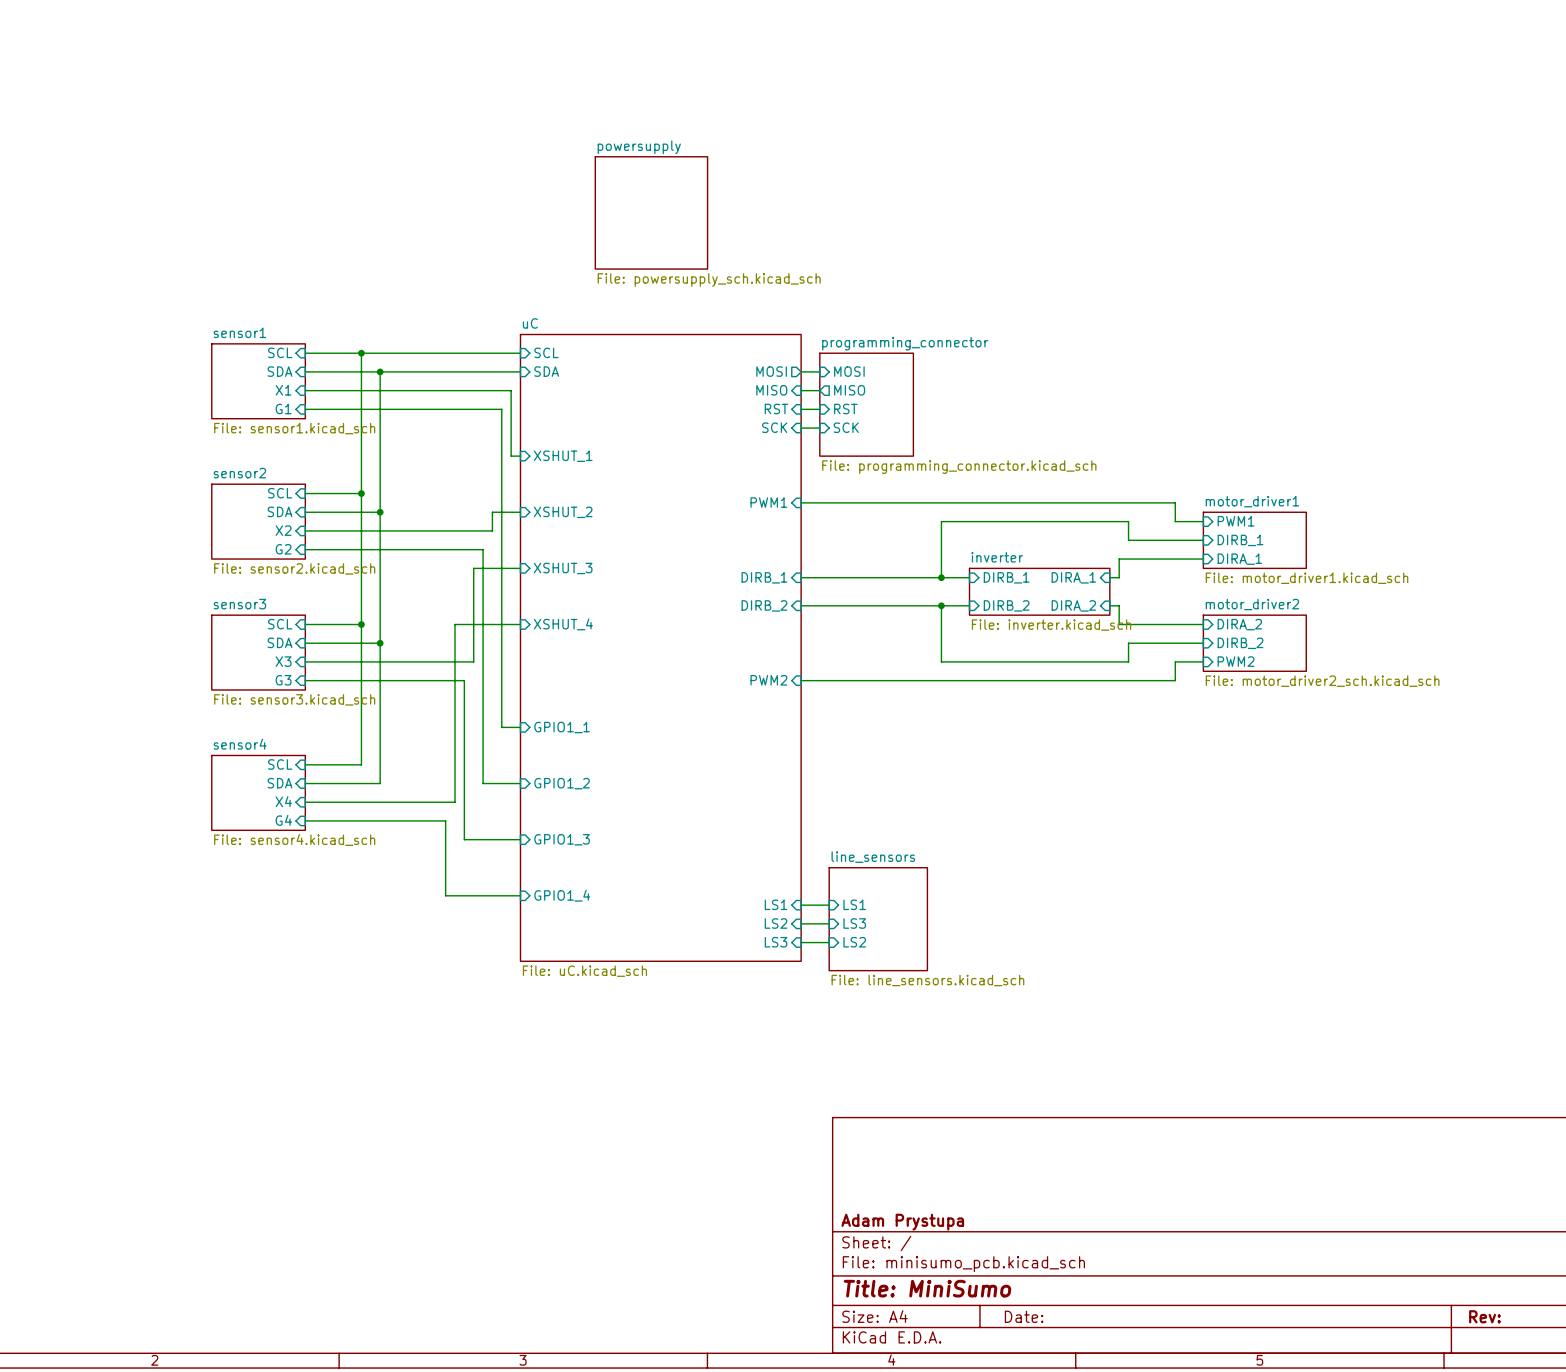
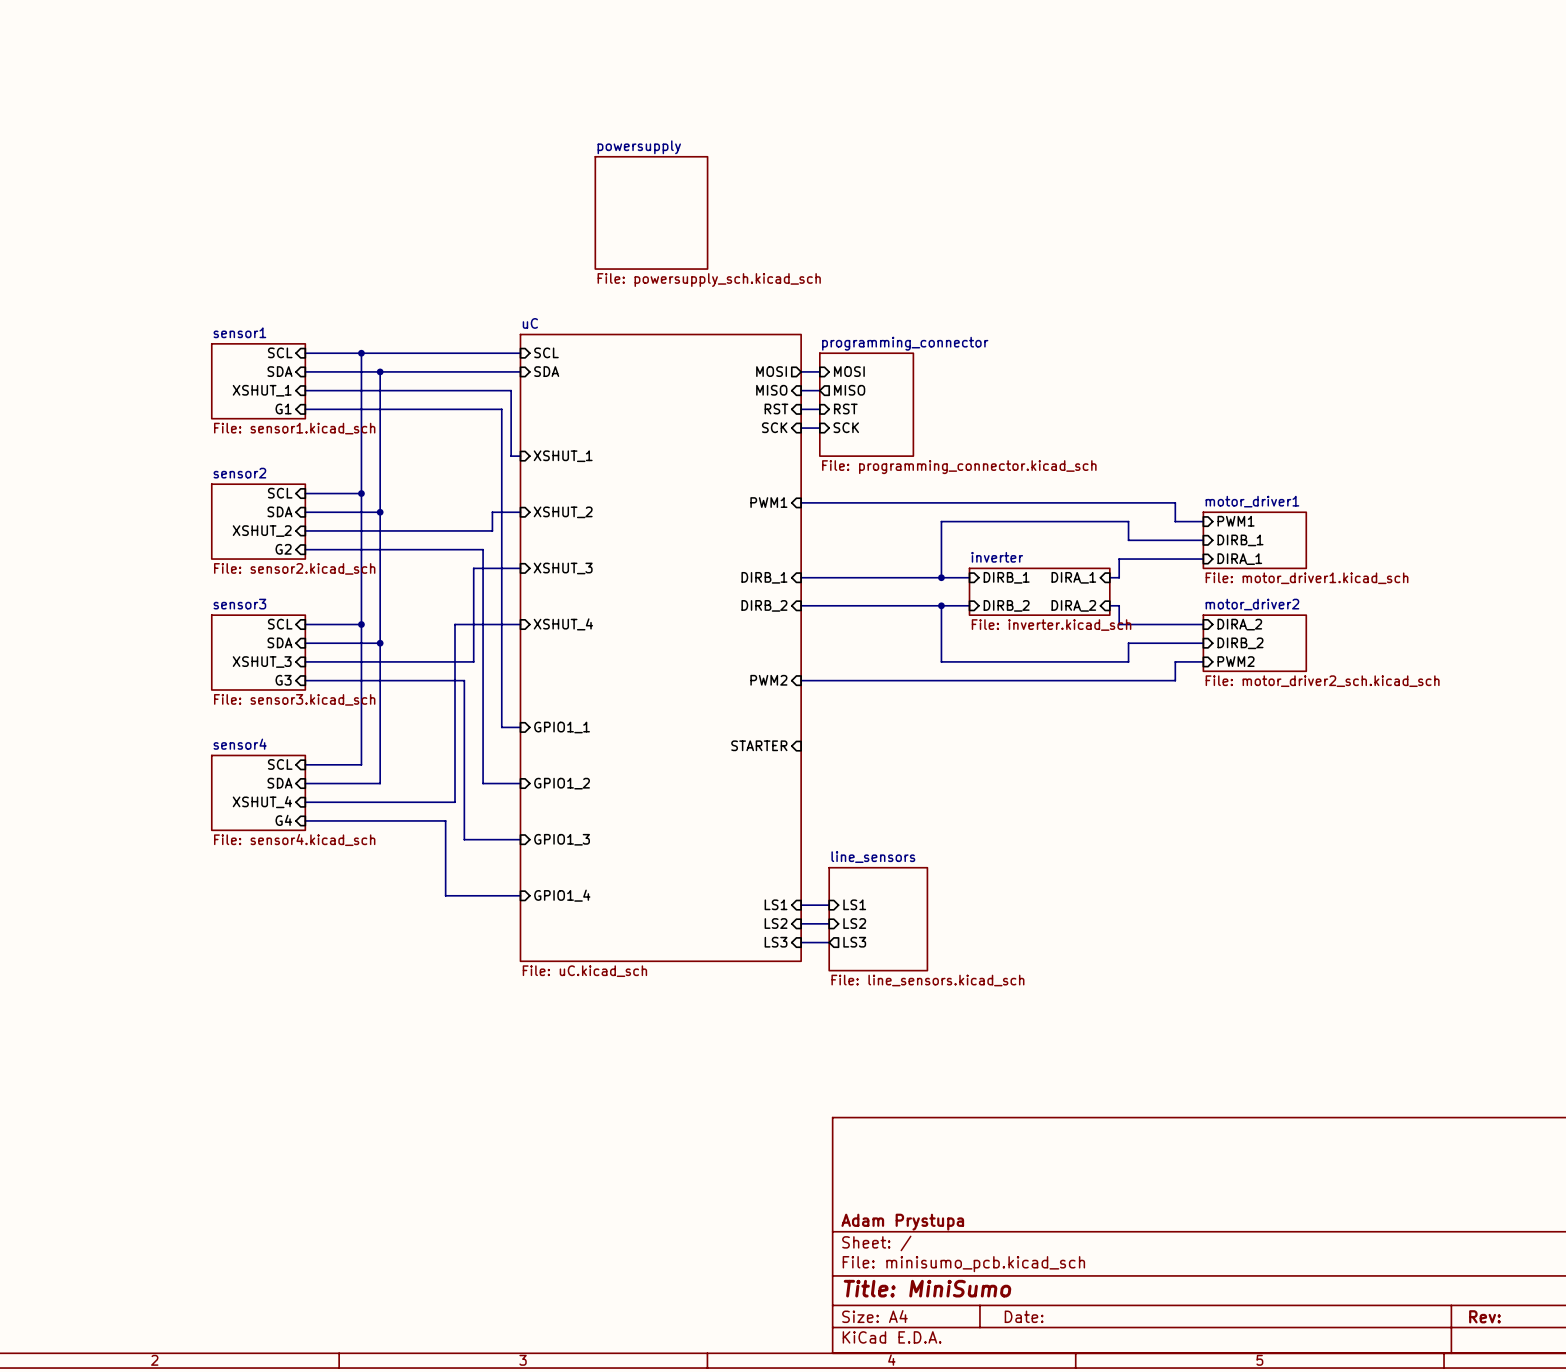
sheet pin: X1 (283, 390) -> XSHUT_1 (262, 390)
sheet pin: X2 (283, 530) -> XSHUT_2 (262, 531)
sheet pin: X3 (283, 661) -> XSHUT_3 (262, 662)
sheet pin: none -> STARTER (759, 745)
sheet pin: X4 (283, 801) -> XSHUT_4 (262, 802)
sheet pin: LS3 (854, 923) -> LS2 (854, 923)
sheet pin shape: input (854, 942) -> output (854, 942)
sheet pin: LS2 (854, 942) -> LS3 (854, 942)

